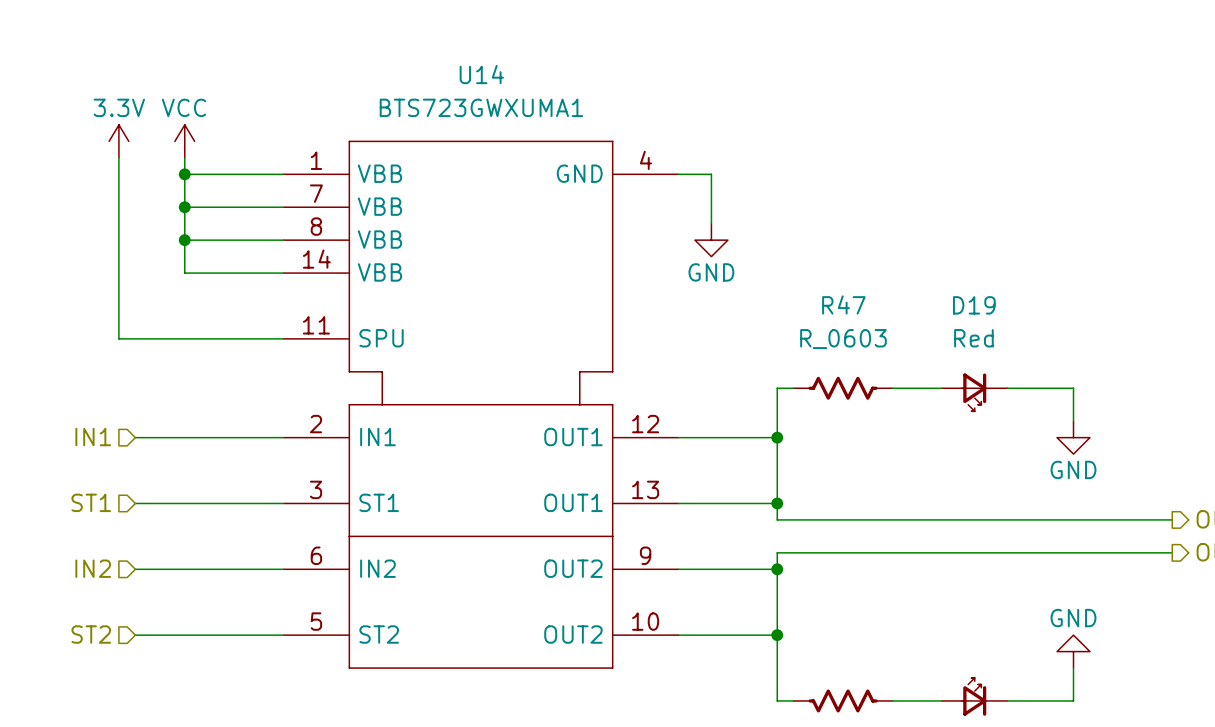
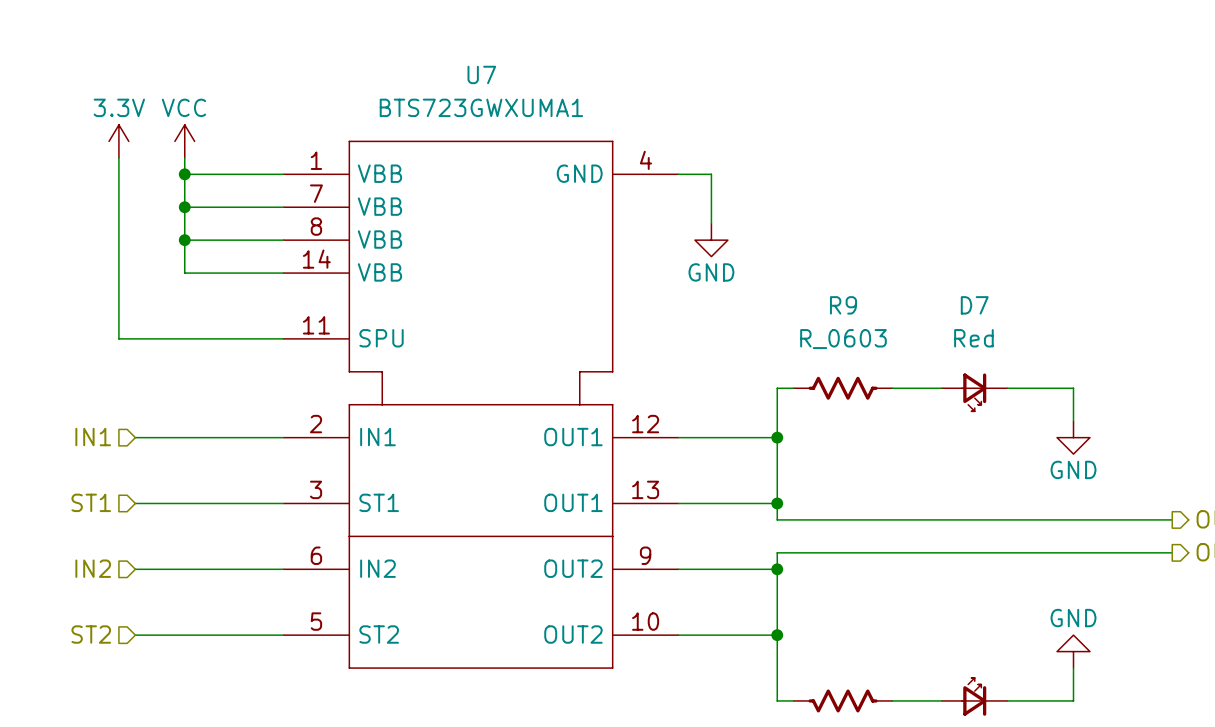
U14 name: U14 (481, 74) -> U7 (481, 74)
R47 name: R47 (843, 304) -> R9 (843, 305)
D19 name: D19 (974, 305) -> D7 (974, 305)

